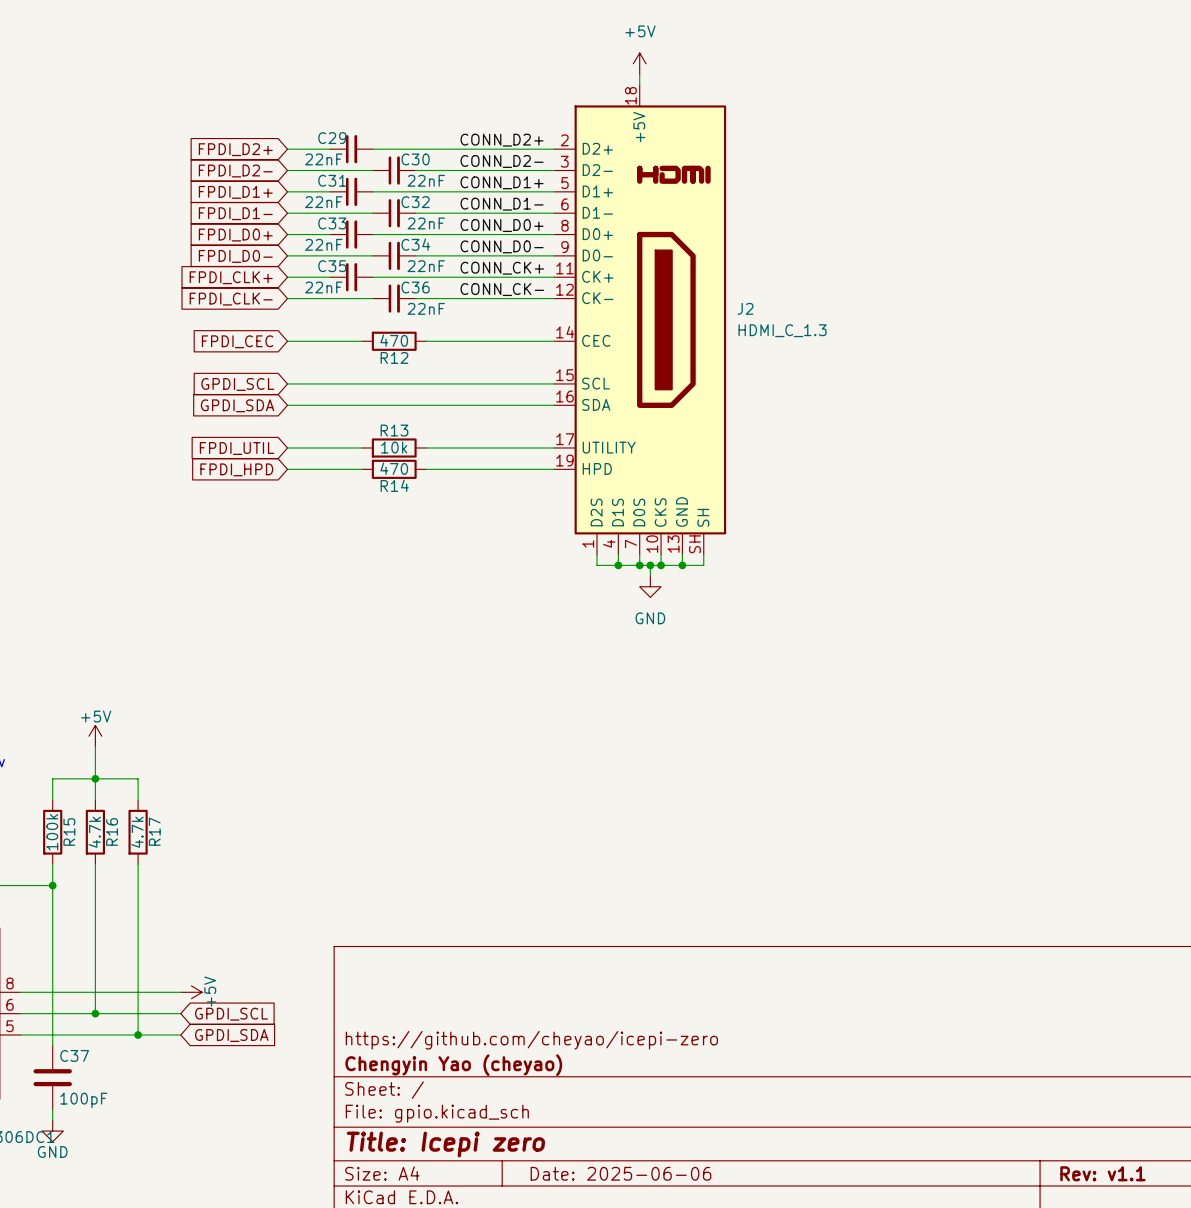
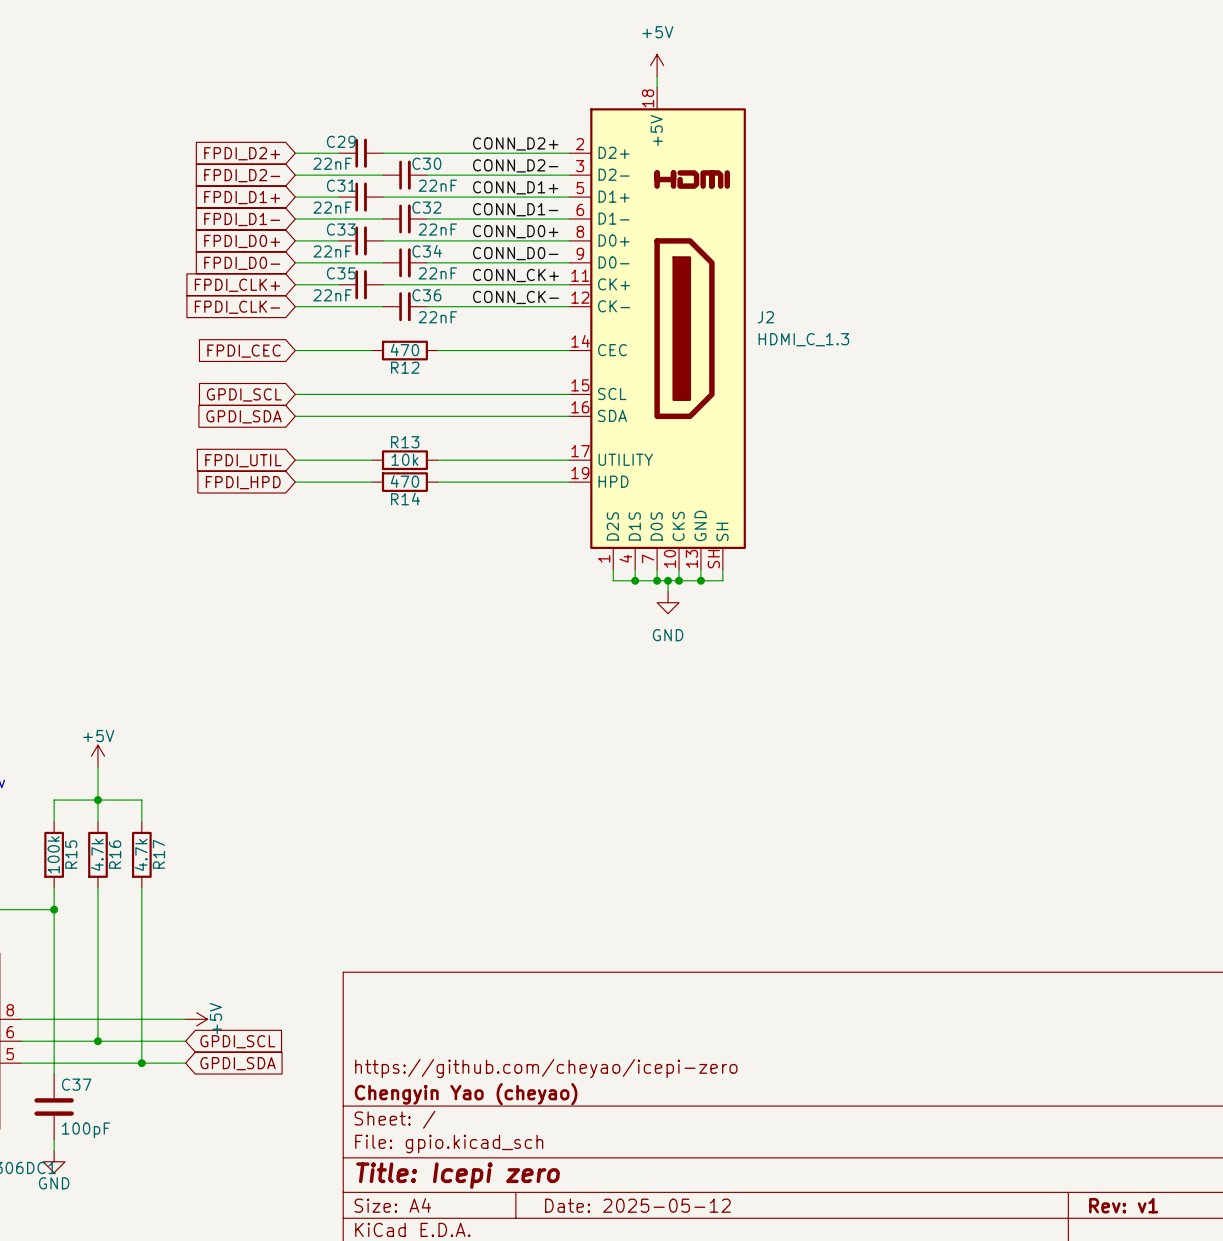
title block: Date: 2025-06-06 (621, 1173) -> Date: 2025-05-12 (637, 1205)
title block: Rev: v1.1 (1102, 1173) -> Rev: v1 (1123, 1205)

